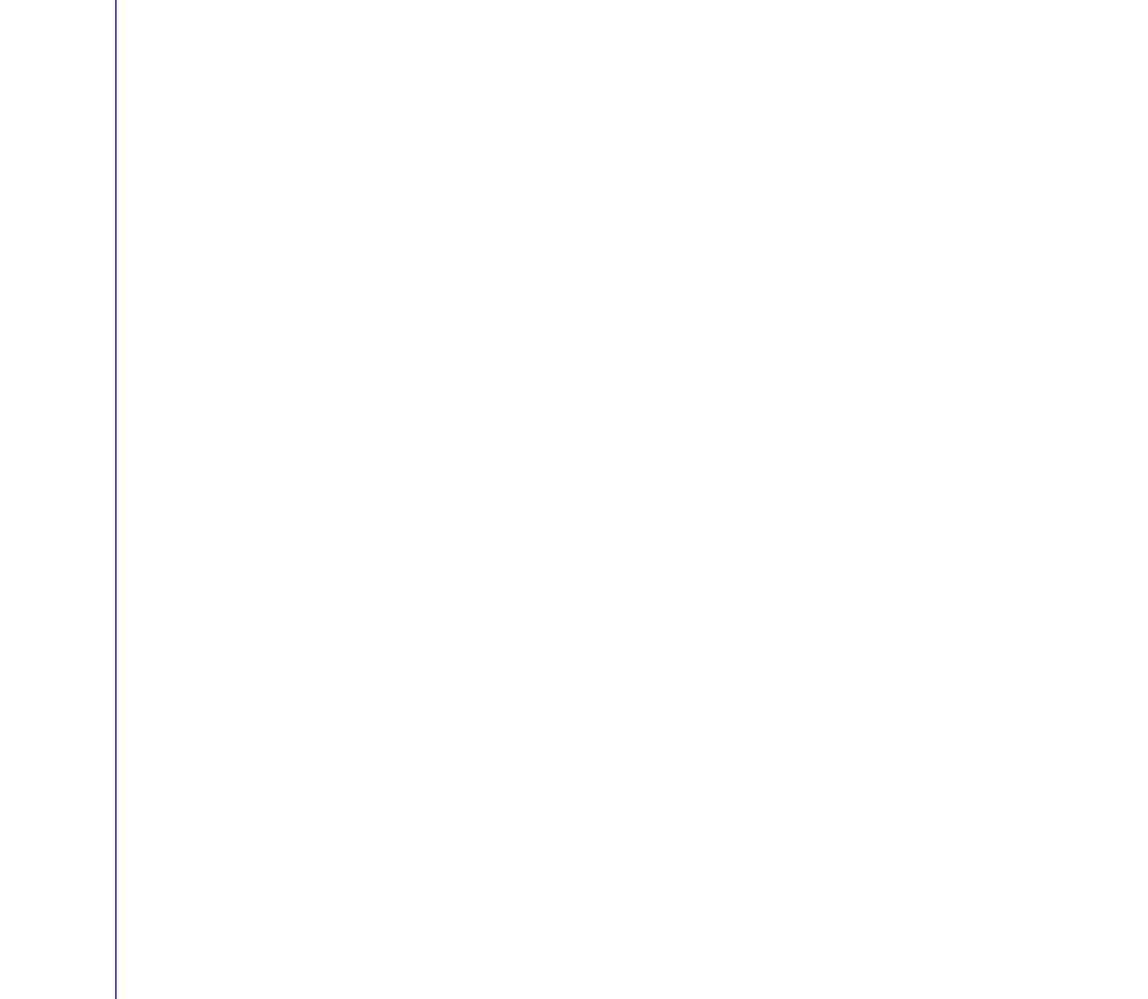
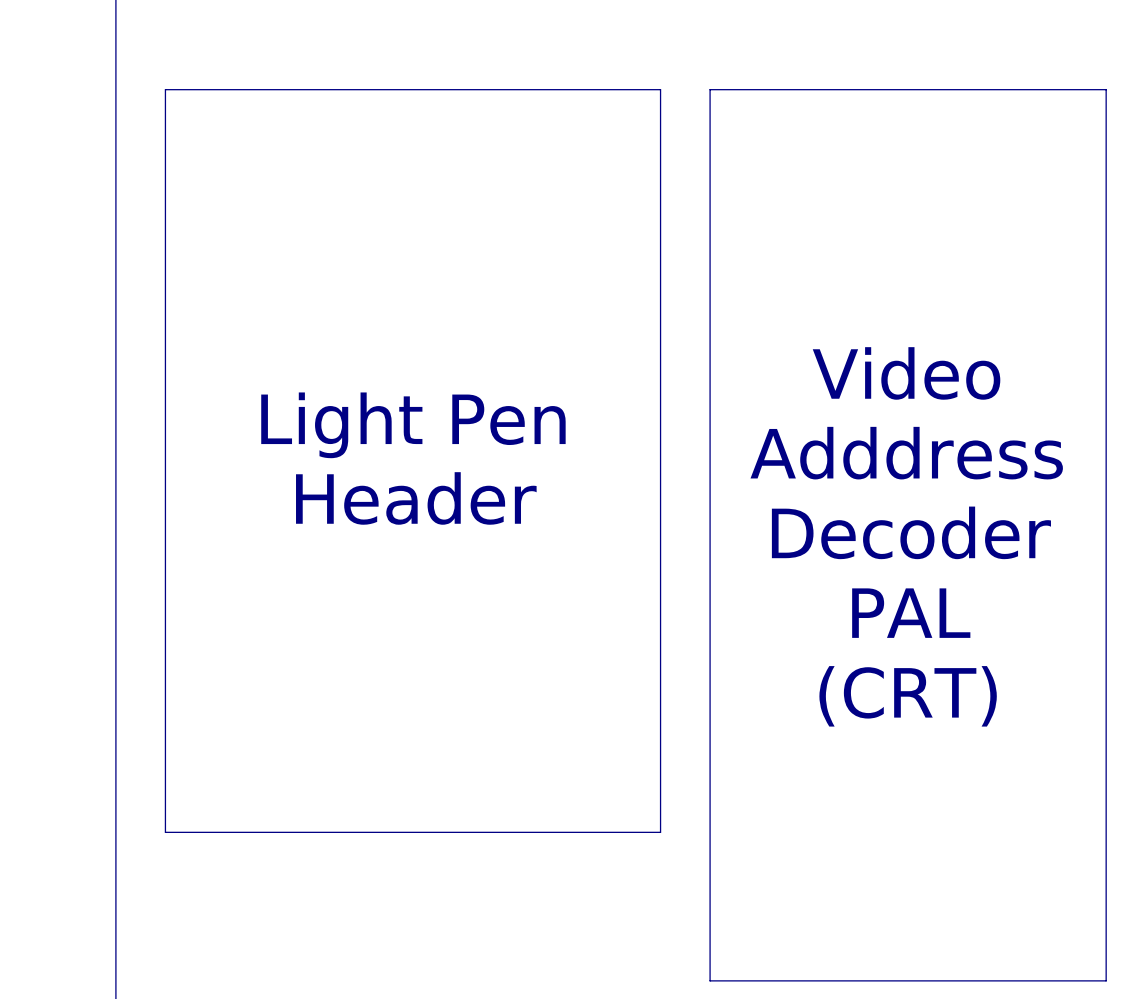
line: none -> (165, 89) (660, 89) (660, 832) (165, 832) (165, 89)
line: none -> (710, 89) (1106, 89) (1106, 980) (710, 980) (710, 89)
text: none -> Video (906, 373)
text: none -> Light Pen (413, 425)
text: none -> Adddress (906, 453)
text: none -> Header (416, 498)
text: none -> Decoder (911, 532)
text: none -> PAL (911, 613)
text: none -> (CRT) (908, 696)

